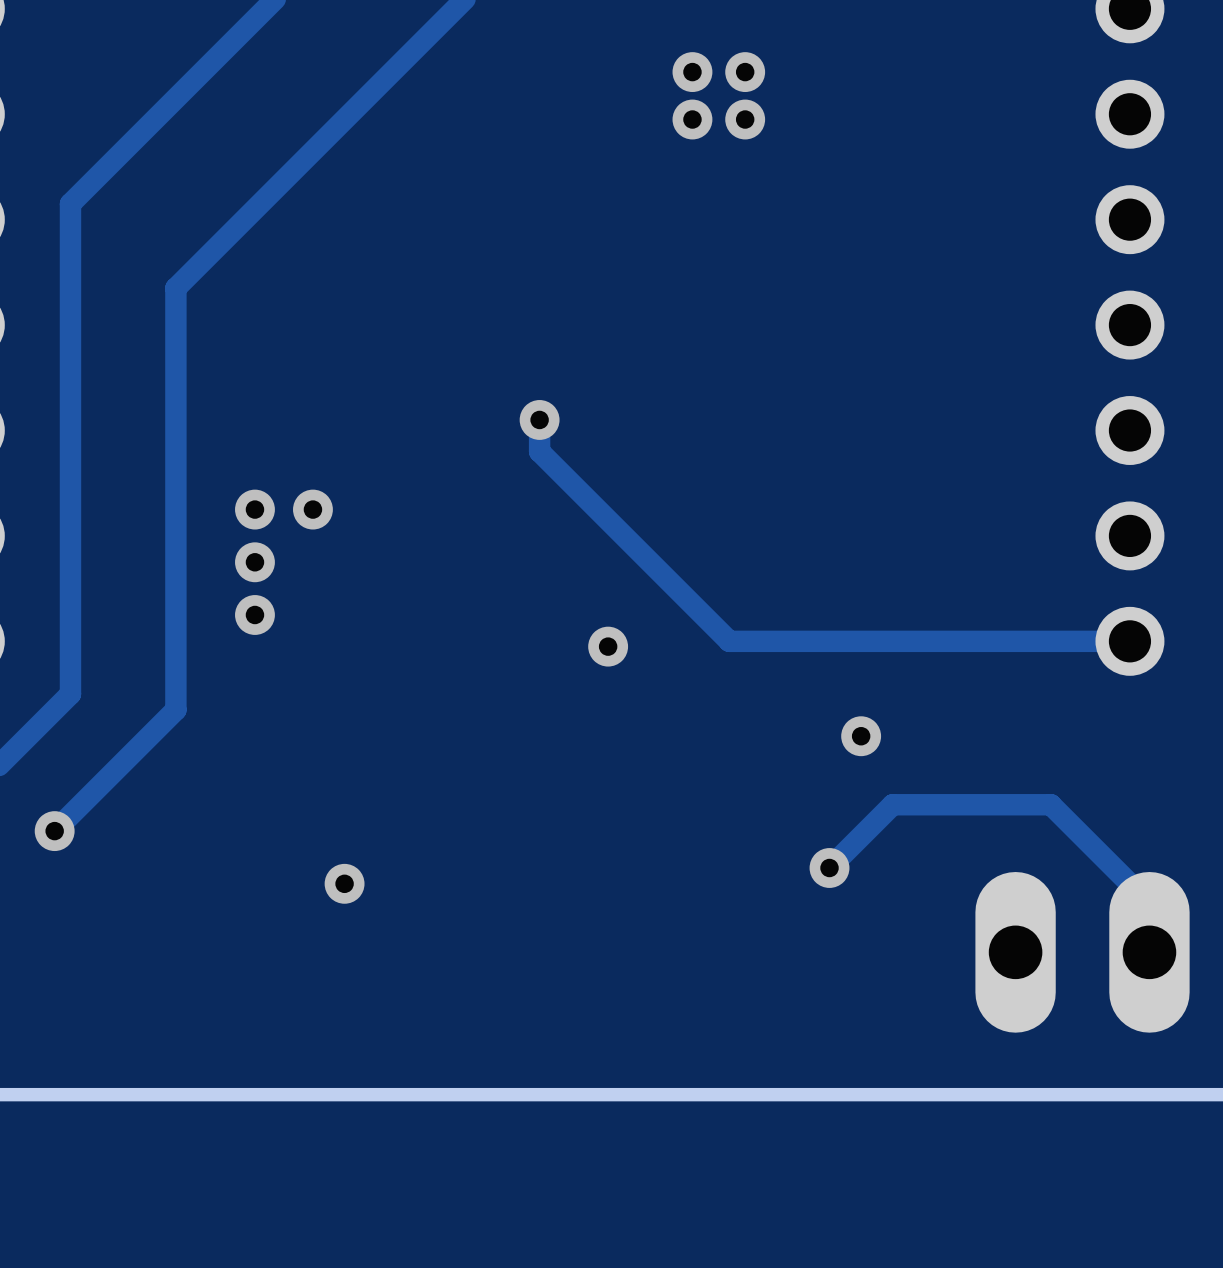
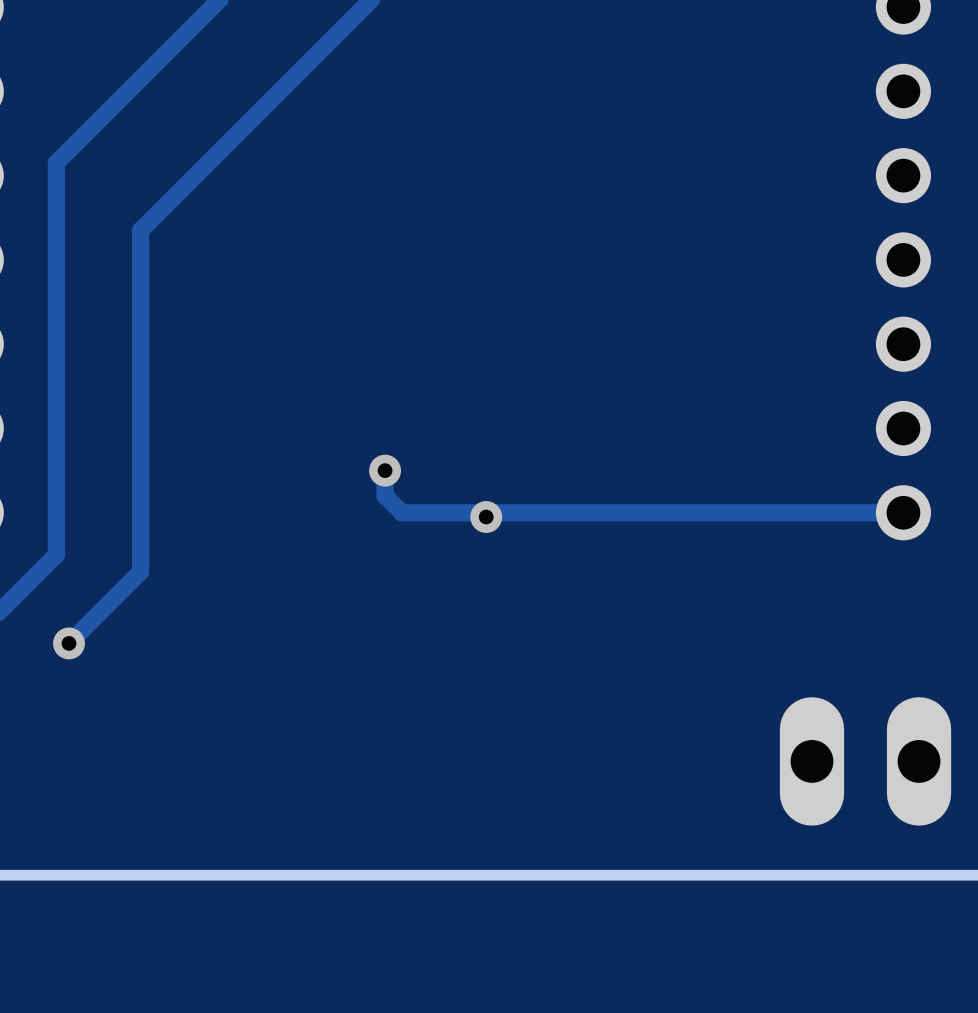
via: (692, 72) -> none
via: (745, 72) -> none
via: (692, 119) -> none
via: (745, 119) -> none
track: (539, 419) (539, 451) (729, 641) -> (385, 470) (385, 495) (401, 512) (583, 512)
via: (539, 419) -> none
via: (254, 509) -> none
via: (312, 509) -> none
via: (254, 562) -> none
via: none -> (385, 470)
via: (254, 614) -> none
track: (175, 709) (54, 831) -> (140, 567) (140, 571) (68, 643)
via: (861, 736) -> none
via position: (54, 831) -> (68, 643)
track: (829, 868) (892, 804) (1050, 804) (1149, 903) (1149, 952) -> none
via: (829, 868) -> none
via: (344, 883) -> none

